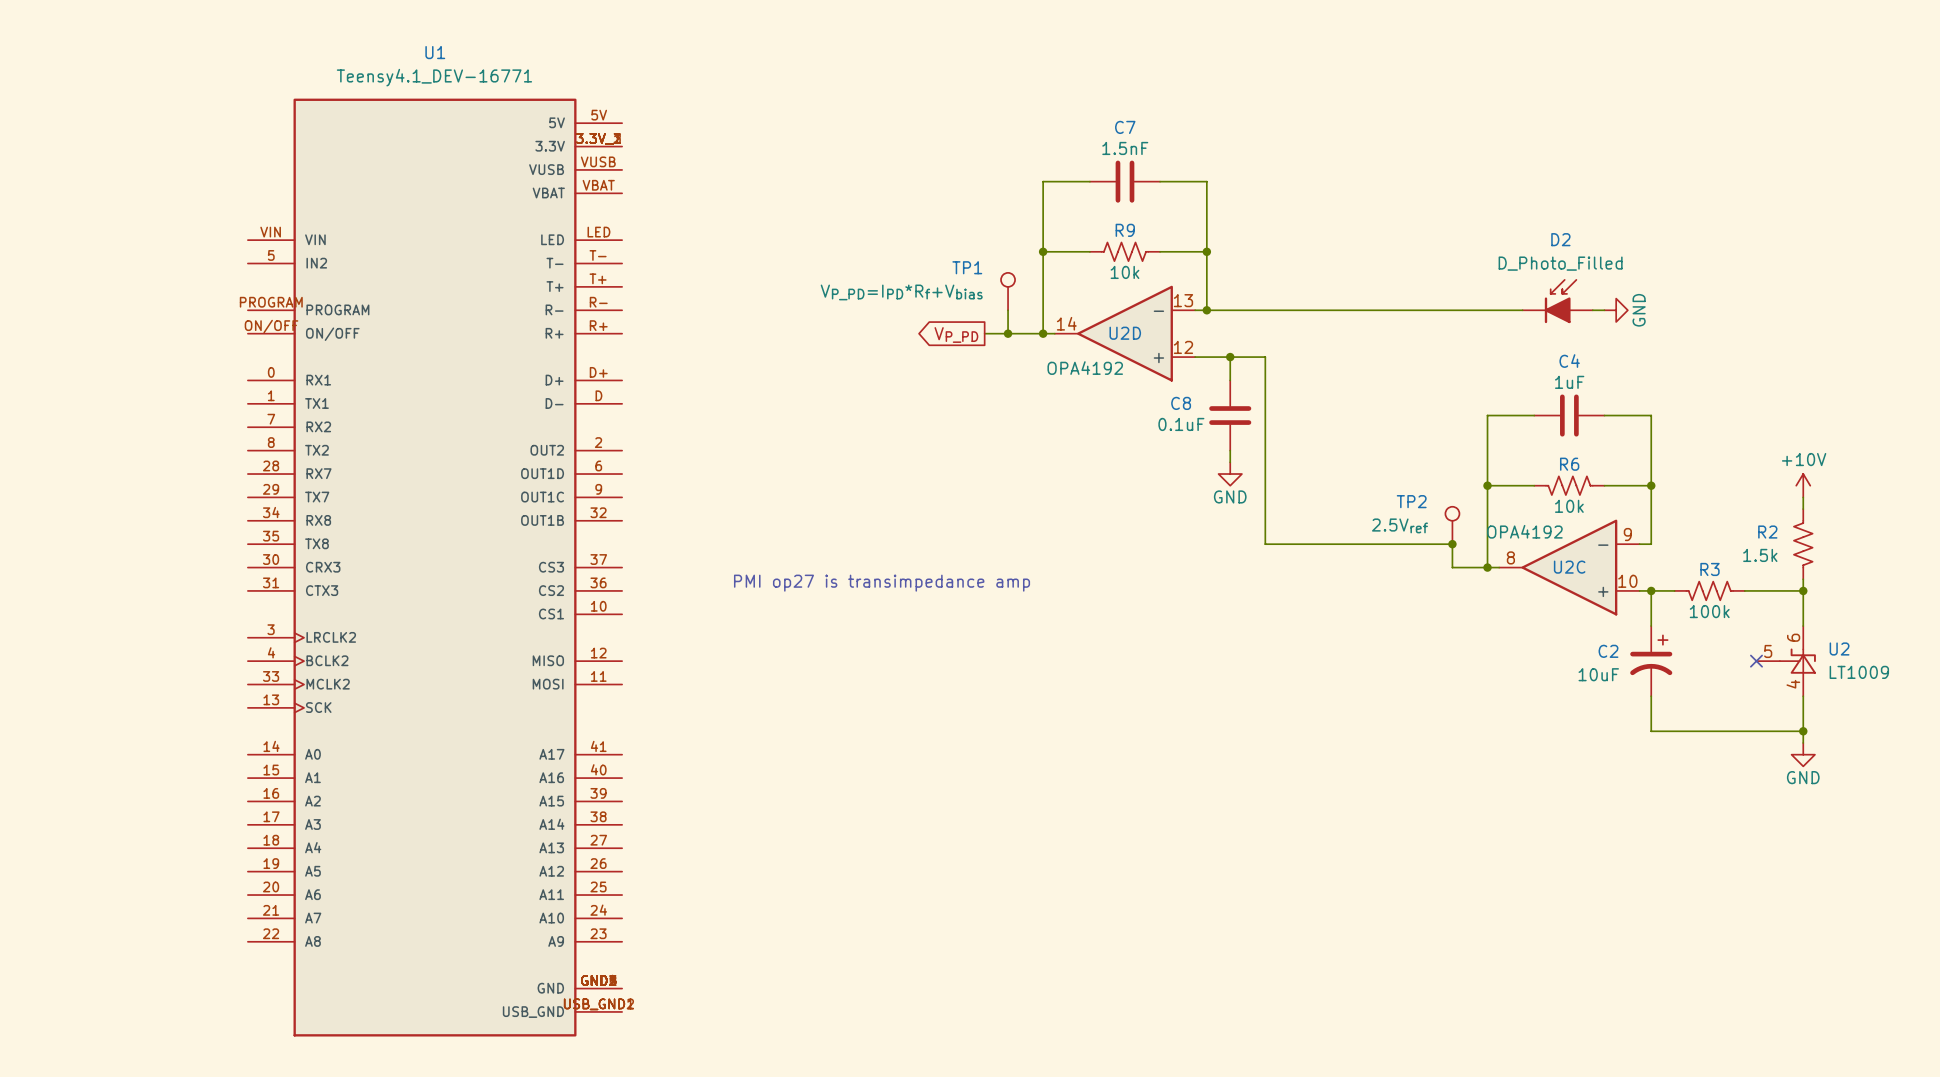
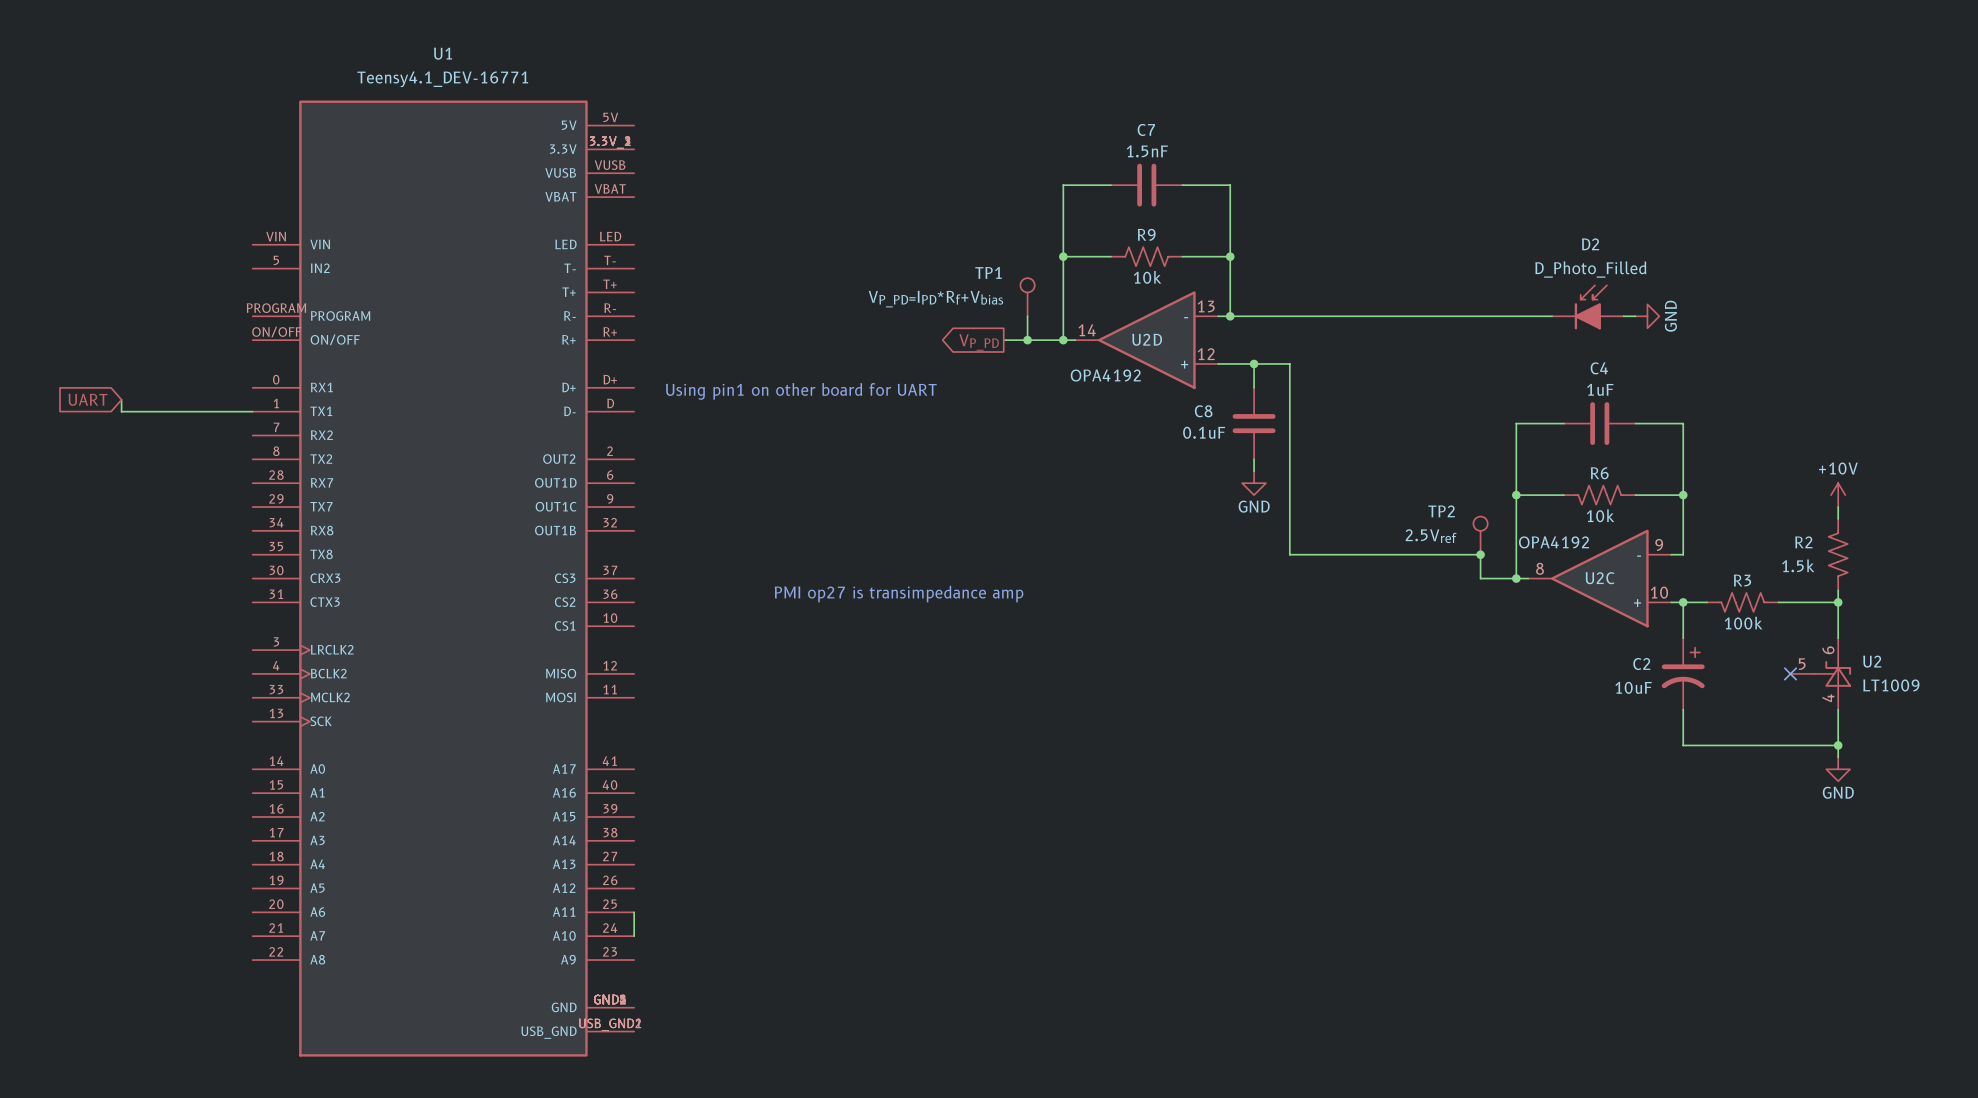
text: none -> Using pin1 on other board for UART (801, 391)
global label: none -> UART (88, 399)
wire: none -> (121, 399) (121, 411) (252, 411)
wire: none -> (634, 912) (634, 936)

